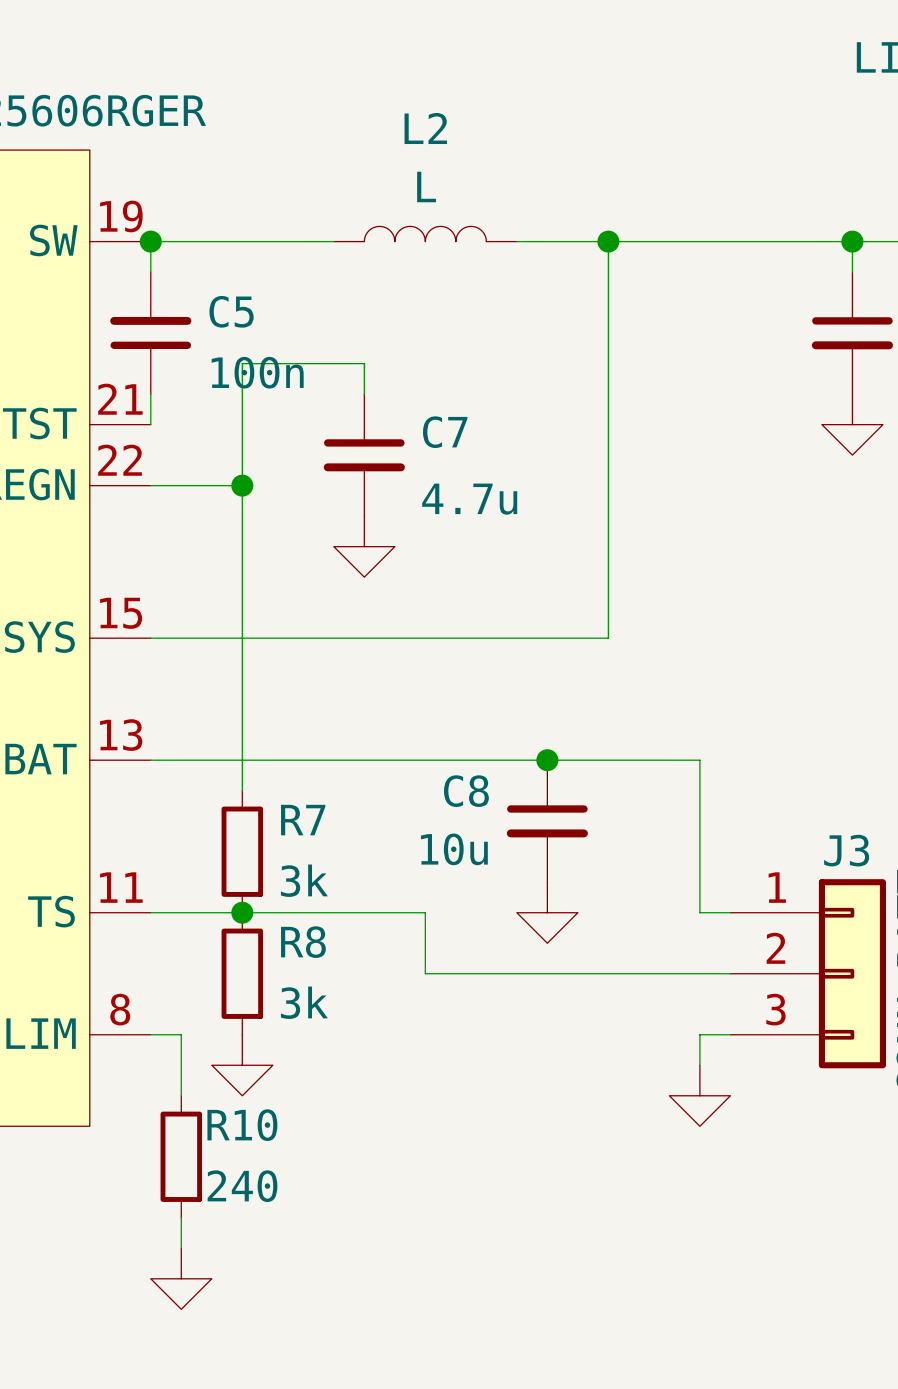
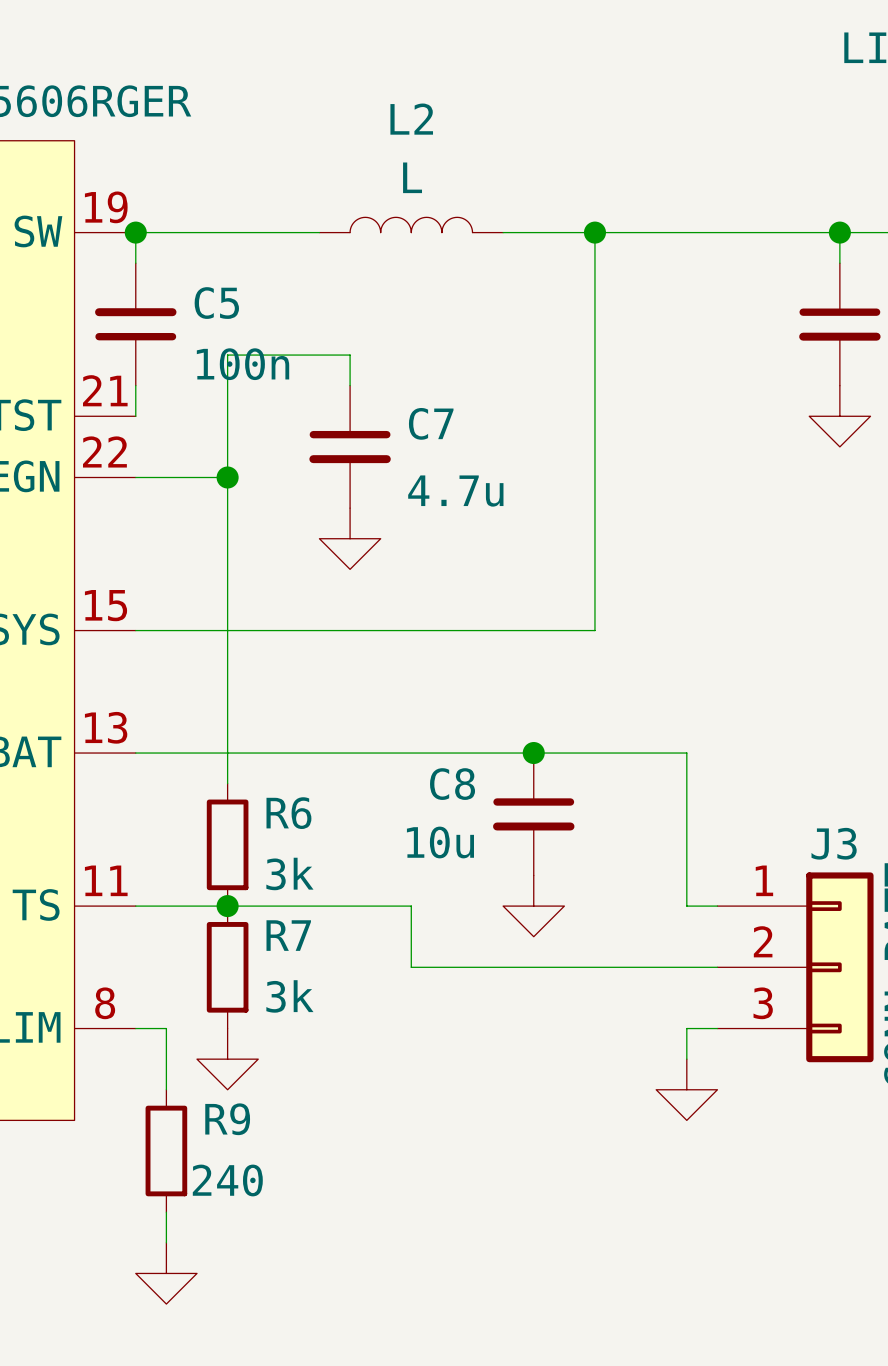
R7 name: R7 (303, 820) -> R6 (288, 813)
R8 name: R8 (303, 942) -> R7 (288, 935)
R10 name: R10 (242, 1125) -> R9 (227, 1119)

